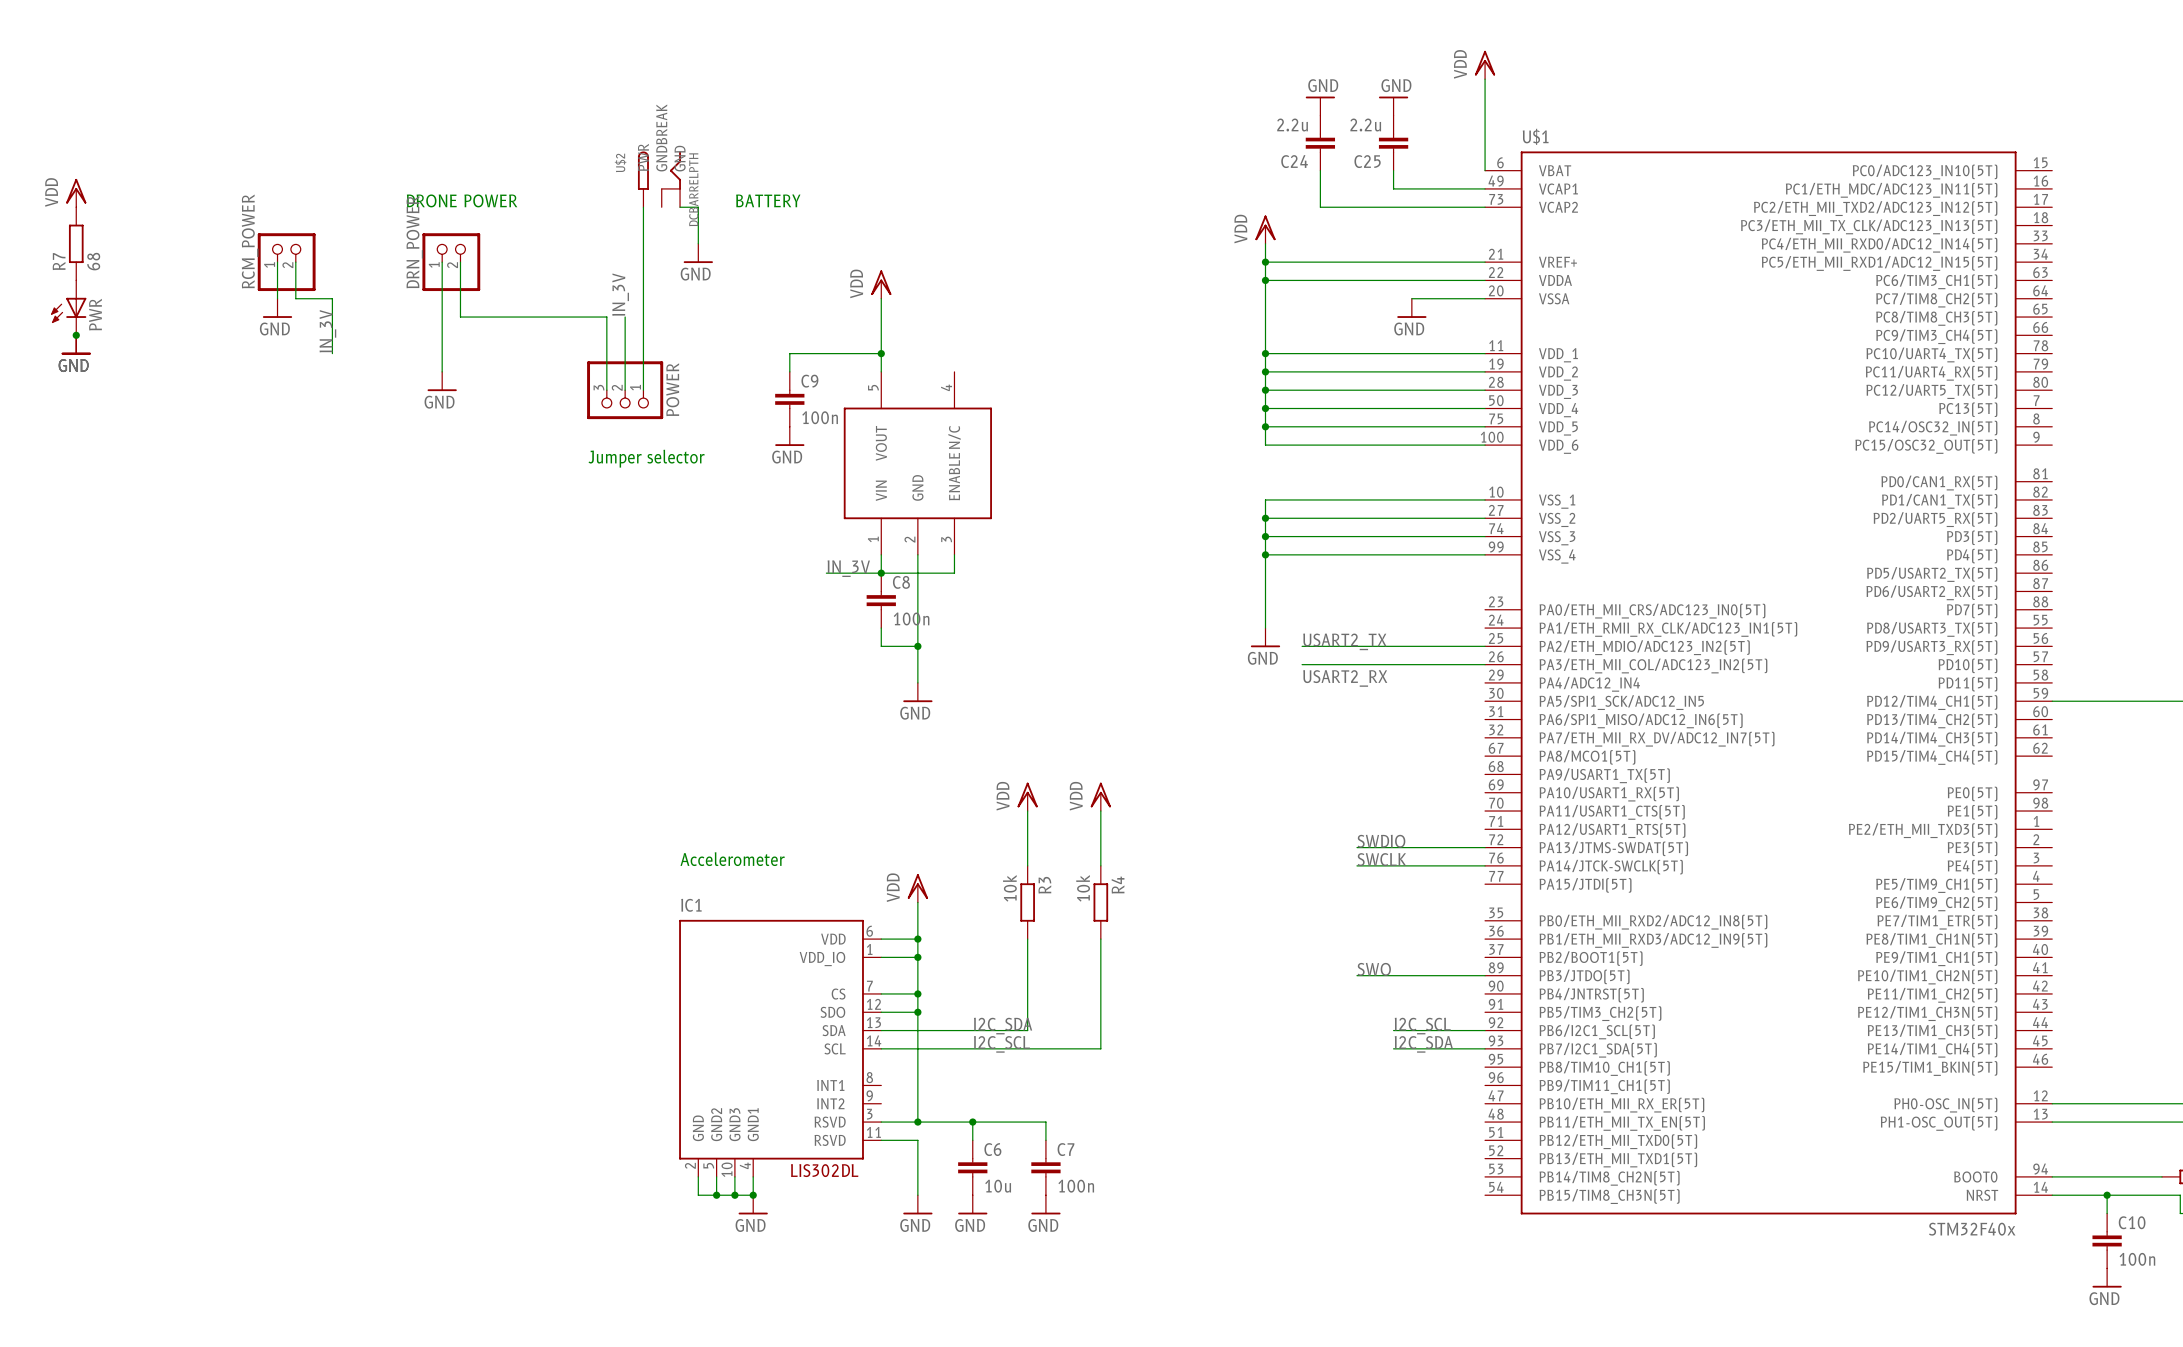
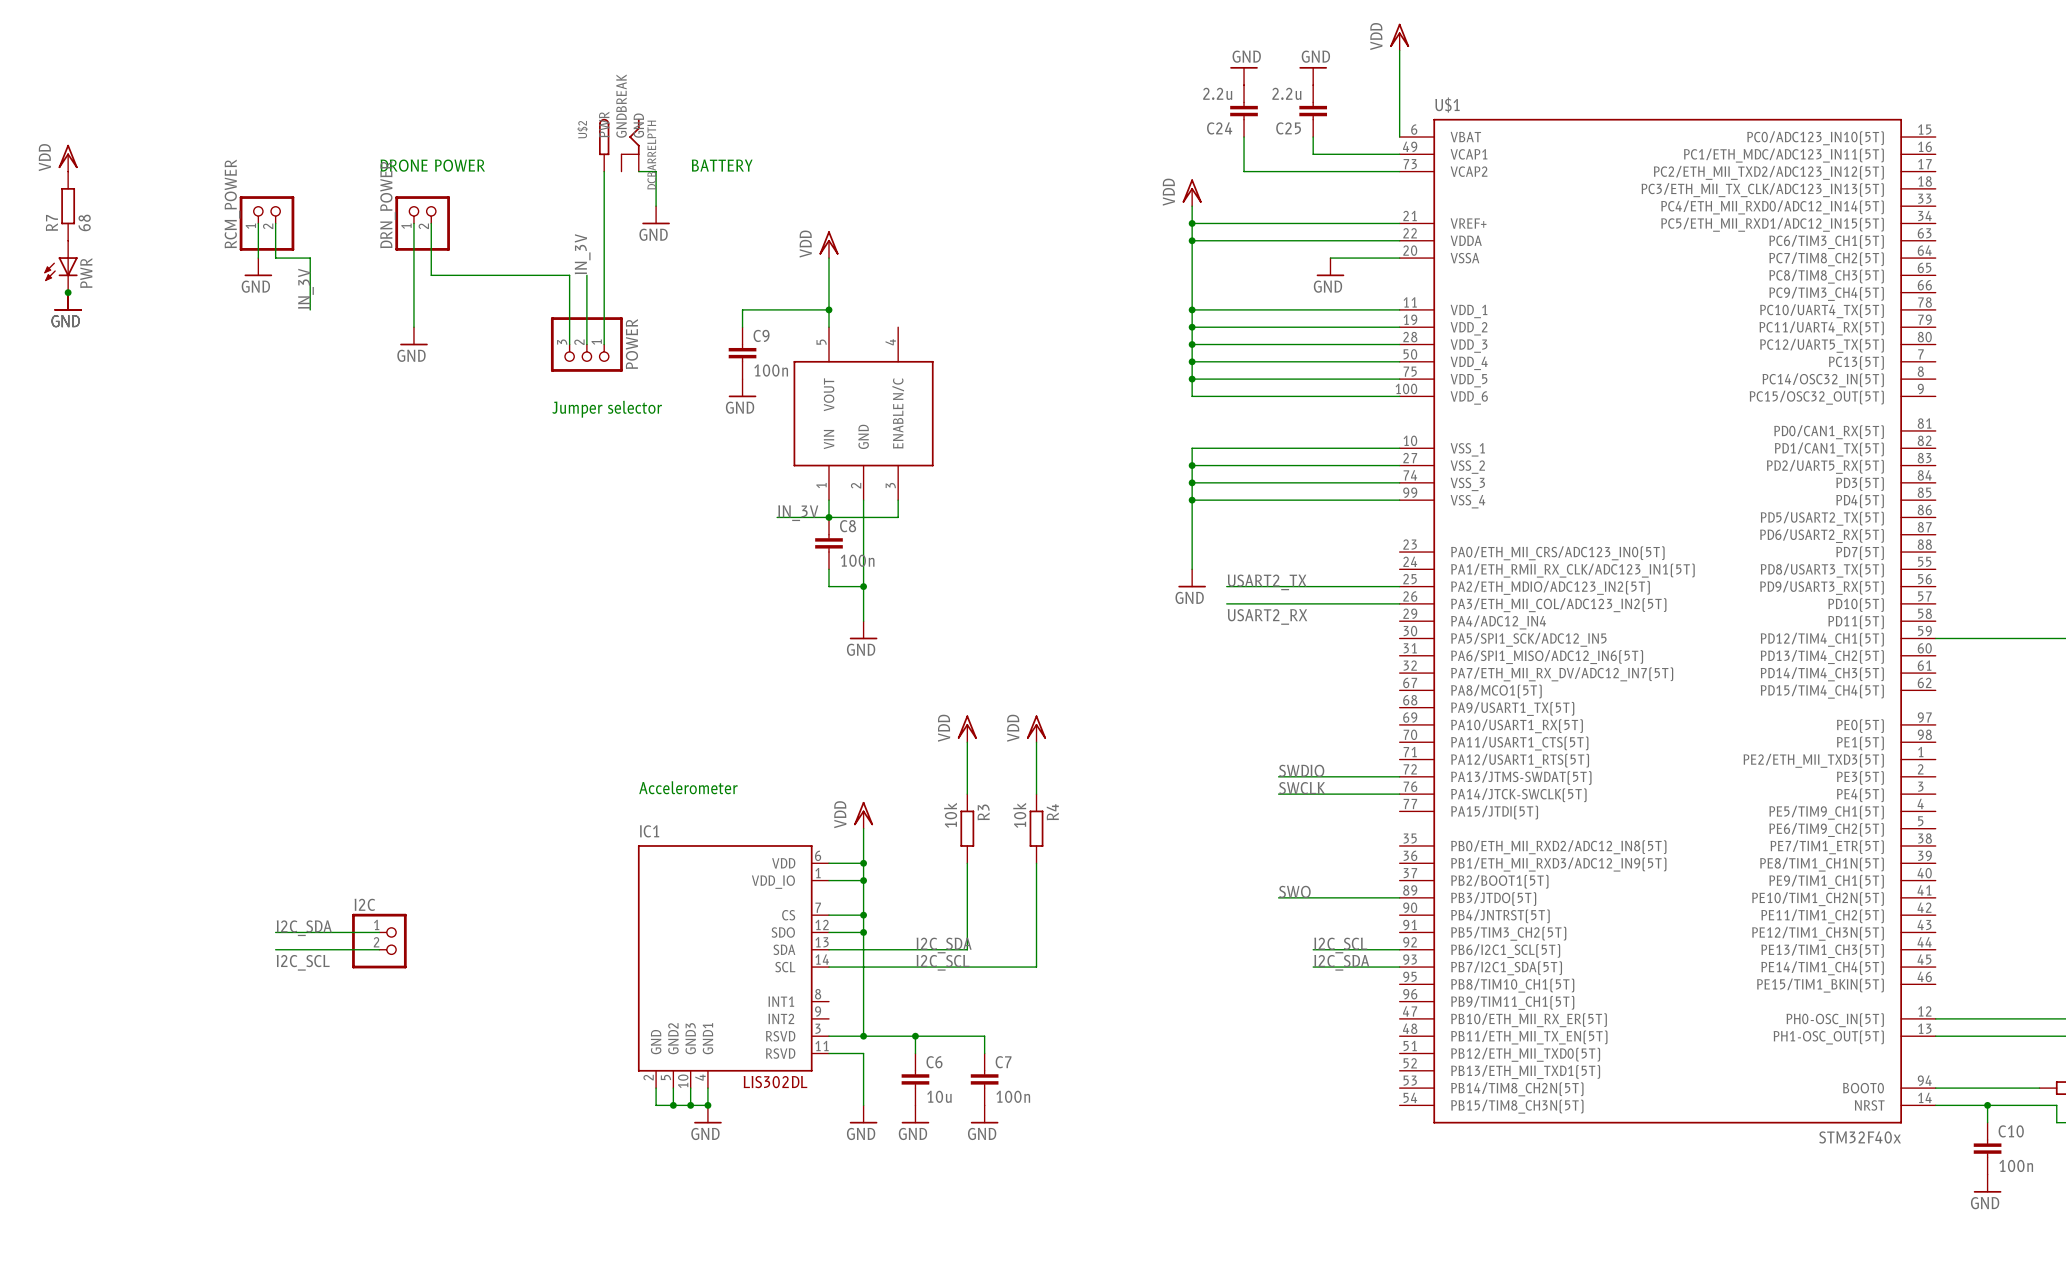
label: none -> I2C_SDA (304, 928)
wire: none -> (275, 932) (379, 932)
I2C: none -> (379, 941)
wire: none -> (275, 949) (379, 949)
label: none -> I2C_SCL (303, 962)

